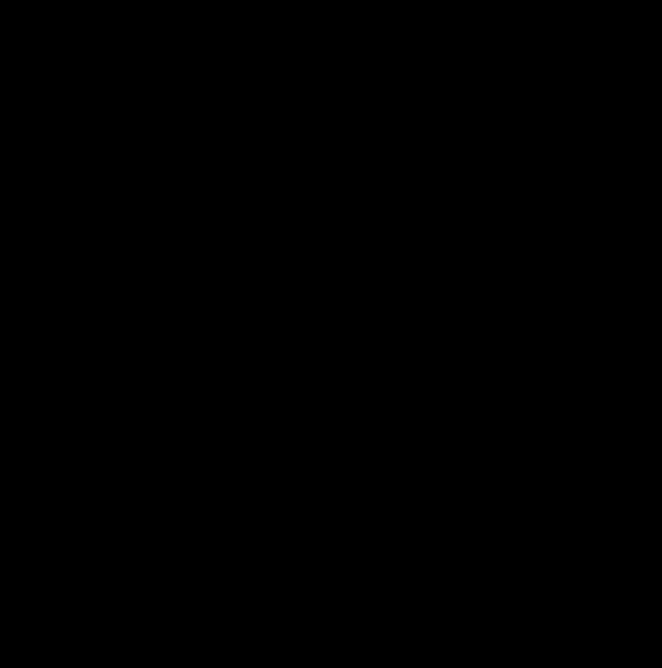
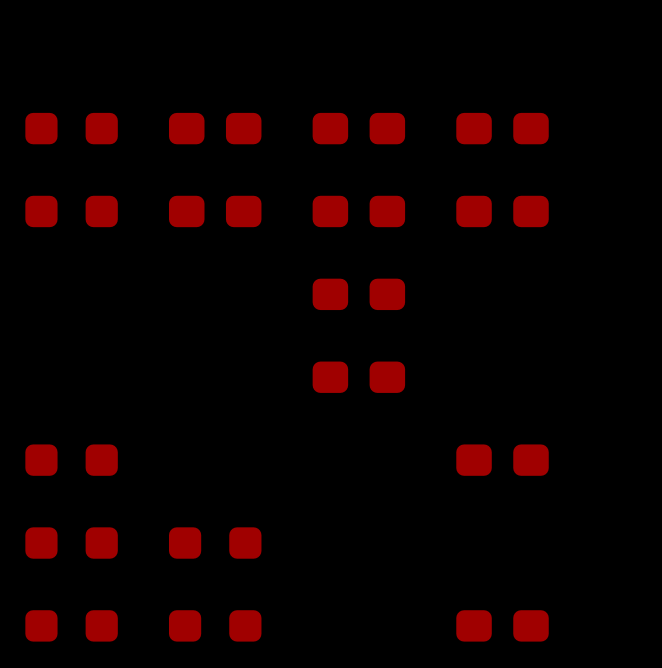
part: none -> (71, 128)
part: none -> (215, 128)
part: none -> (358, 128)
part: none -> (502, 128)
part: none -> (71, 211)
part: none -> (215, 211)
part: none -> (358, 211)
part: none -> (502, 211)
part: none -> (358, 294)
part: none -> (358, 377)
part: none -> (71, 460)
part: none -> (502, 460)
part: none -> (71, 543)
part: none -> (215, 543)
part: none -> (71, 625)
part: none -> (215, 625)
part: none -> (502, 625)

